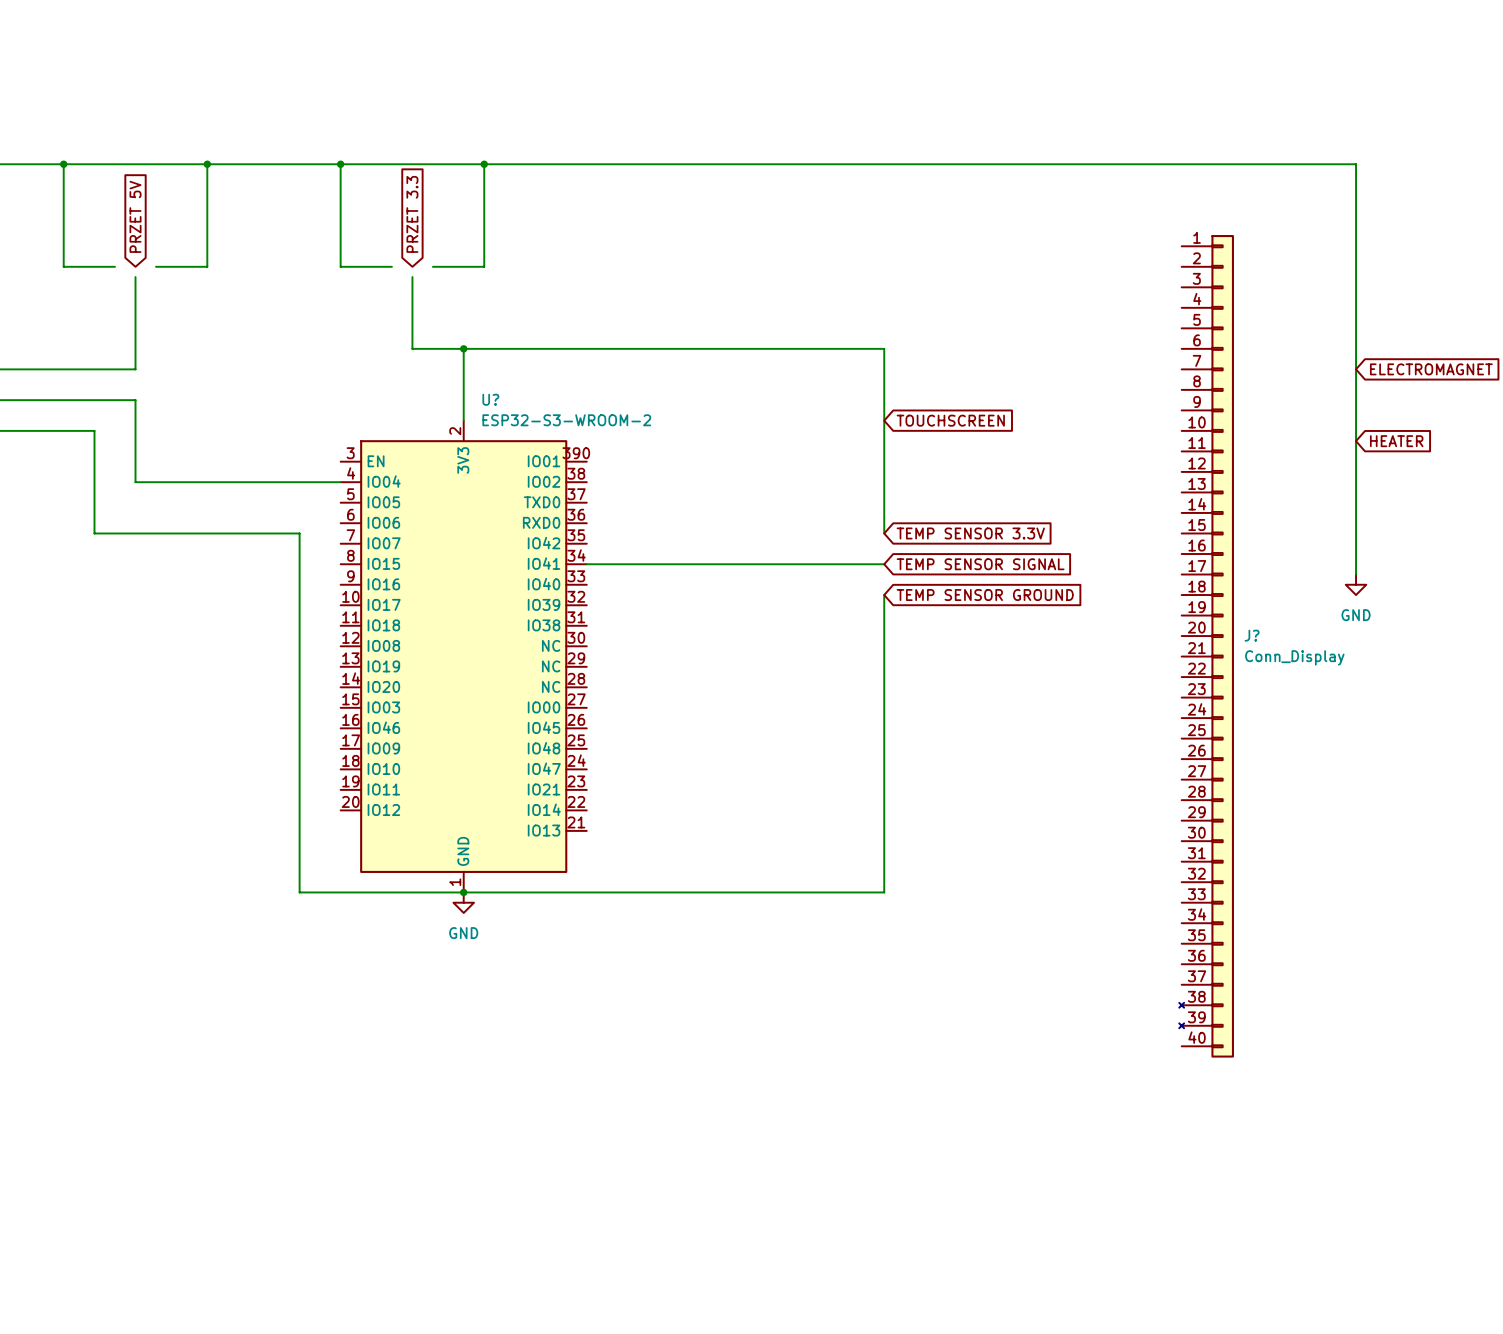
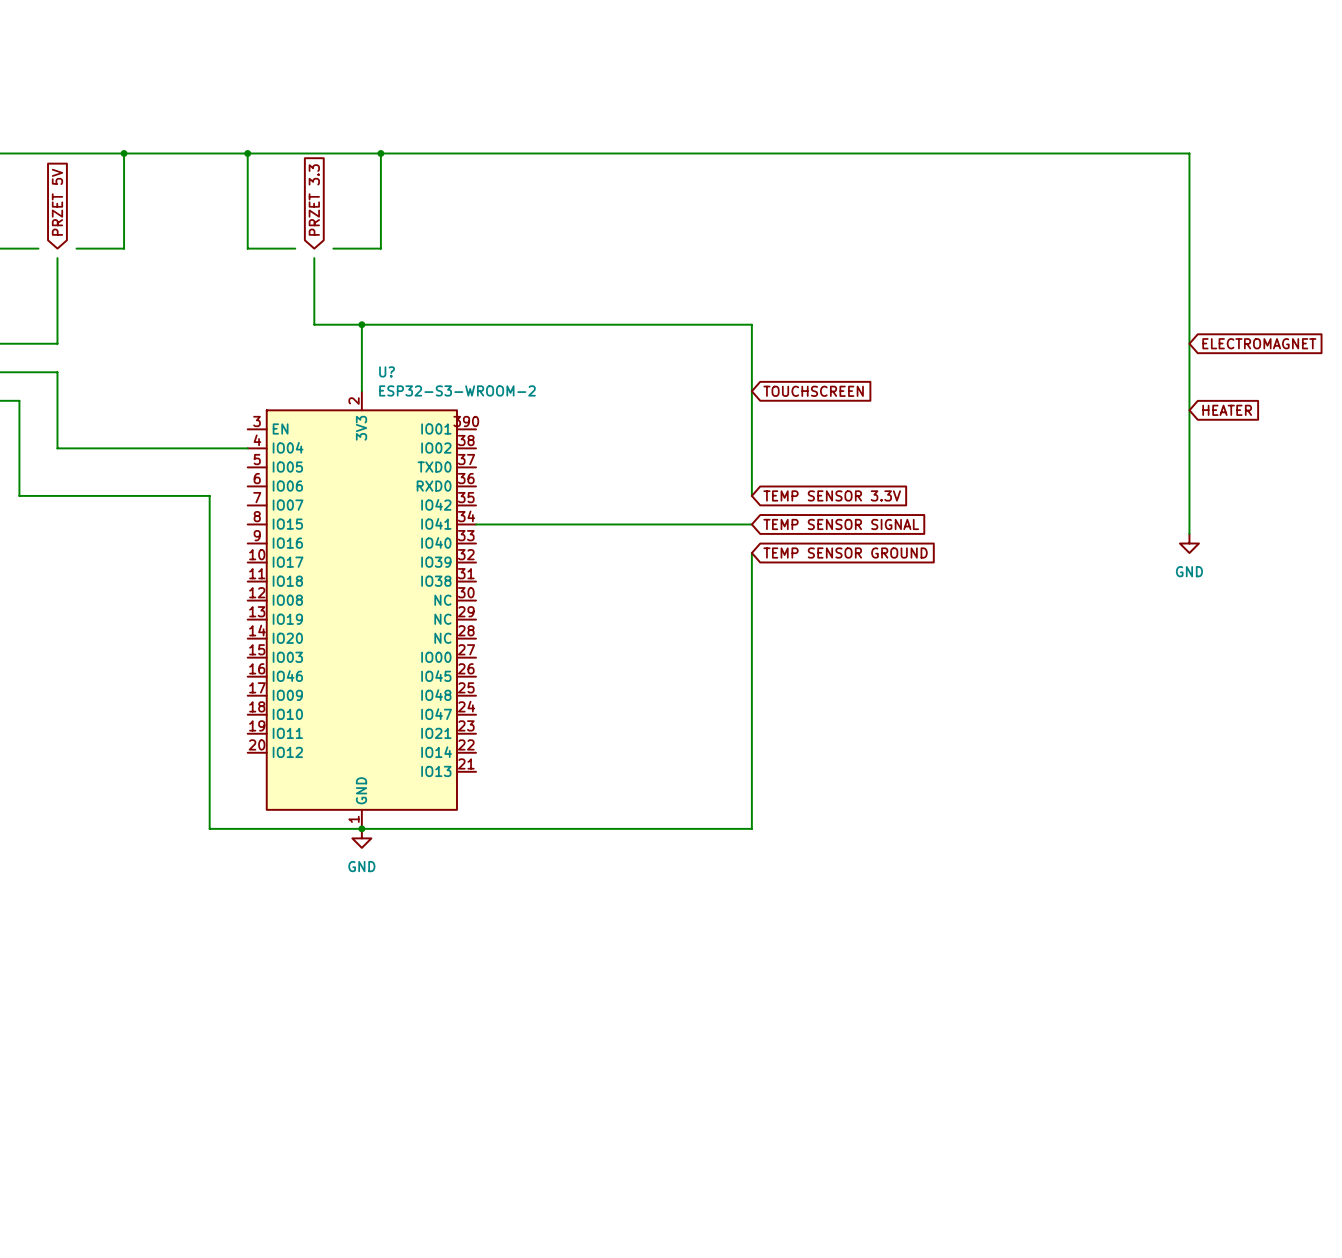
J?: Conn_Display (1206, 646) -> none

